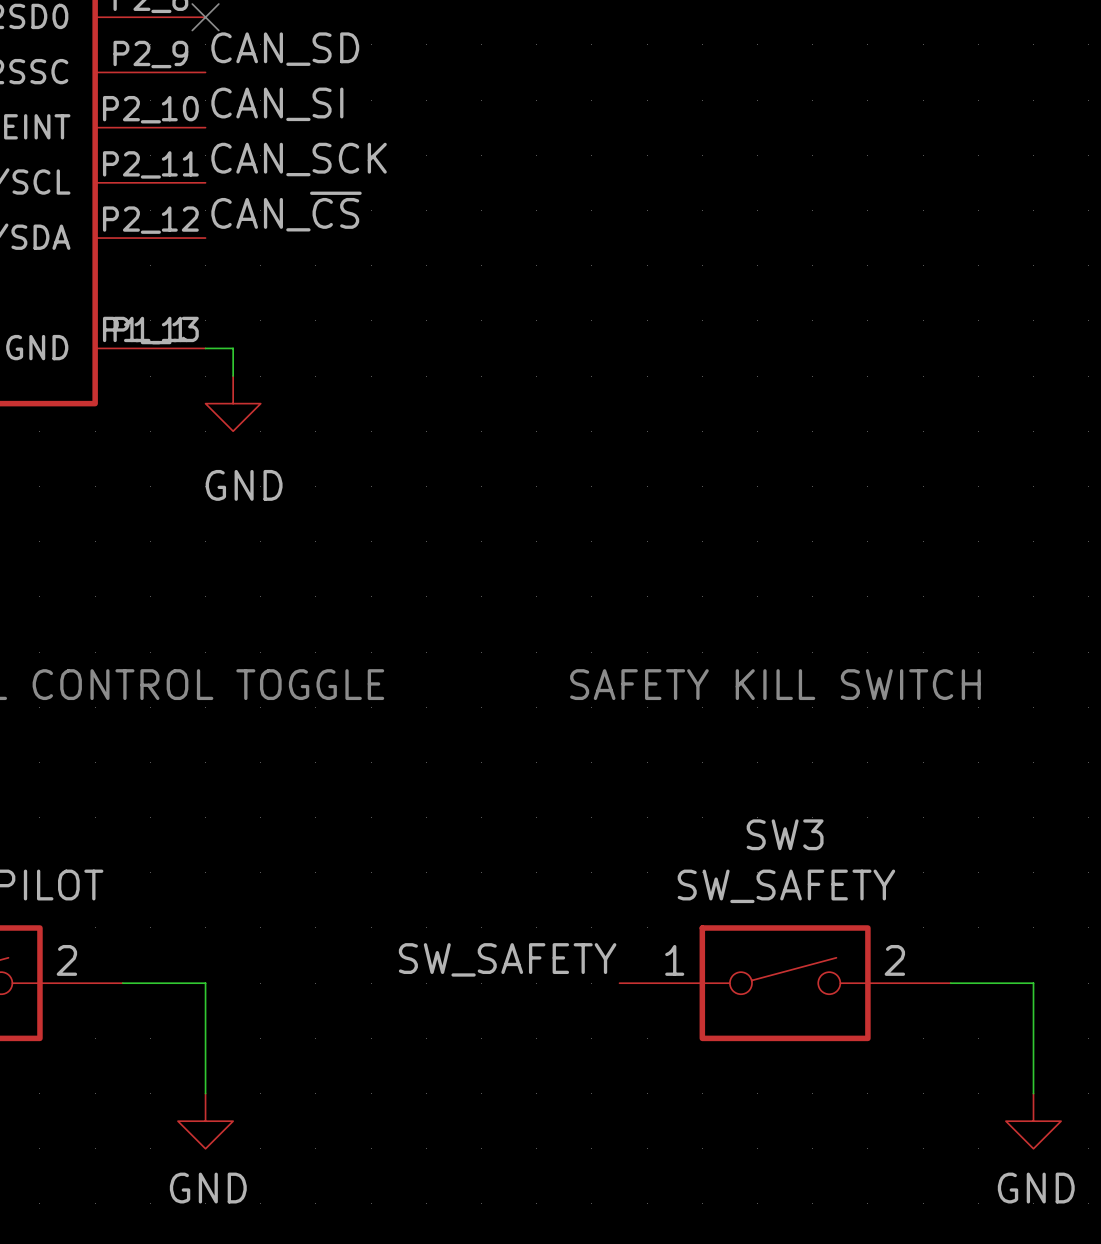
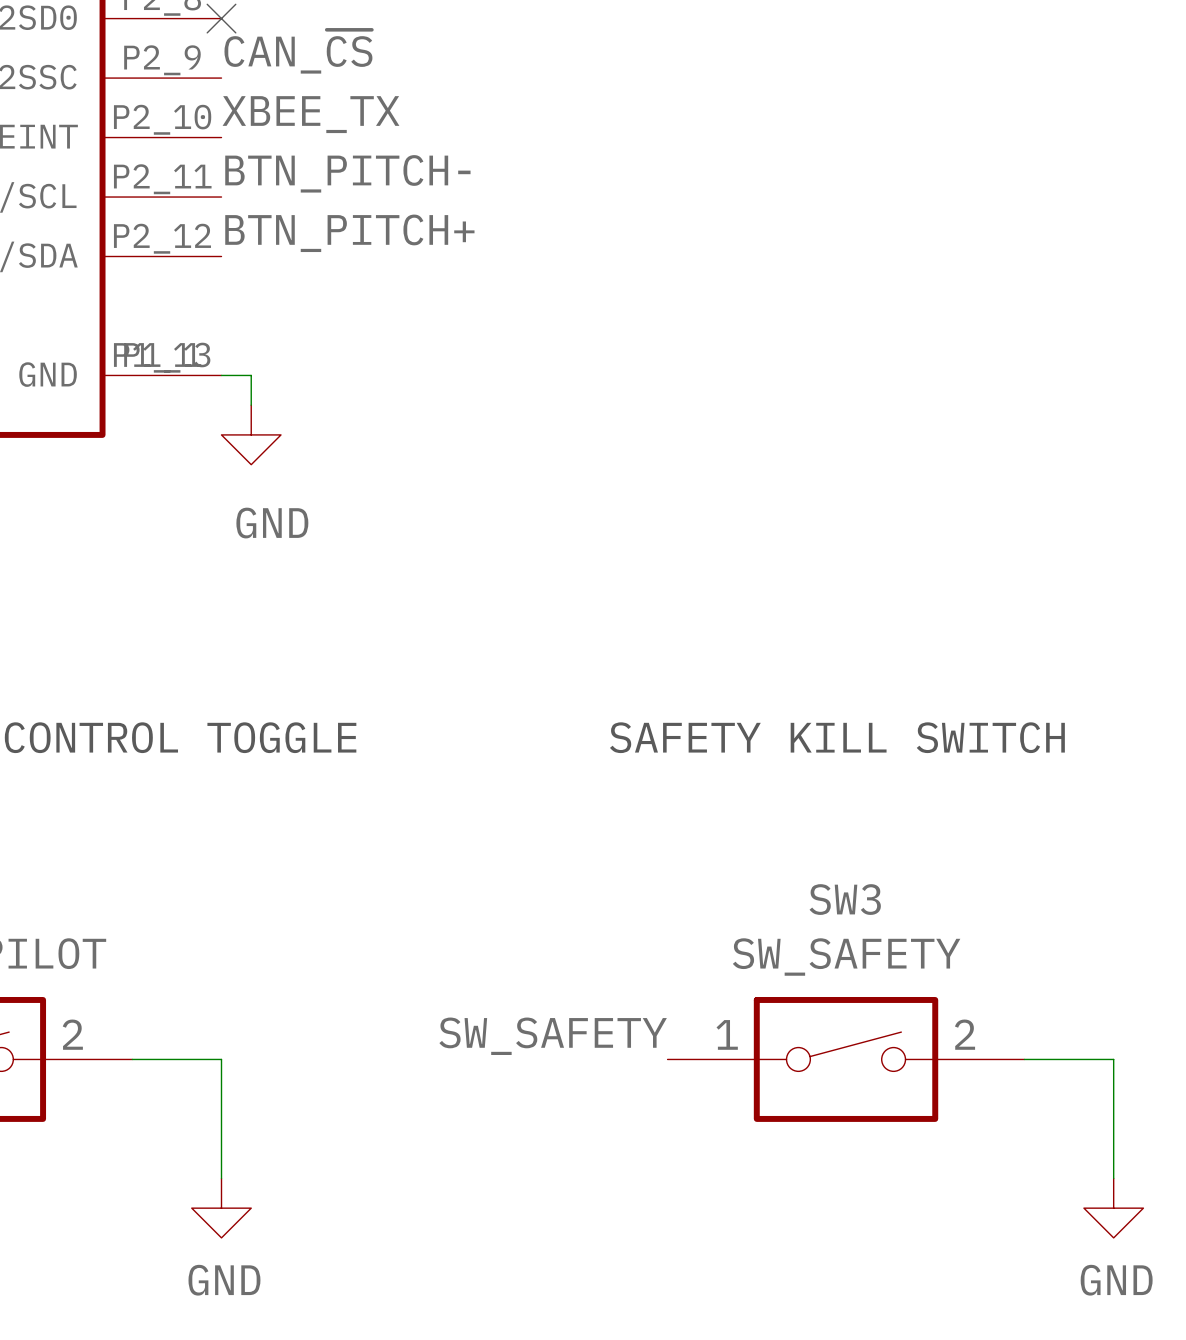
label: CAN_SD (285, 49) -> CAN_~{CS} (298, 51)
label: CAN_SI (277, 104) -> XBEE_TX (310, 114)
label: CAN_SCK (299, 159) -> BTN_PITCH- (347, 173)
label: CAN_~{CS} (286, 211) -> BTN_PITCH+ (349, 233)

